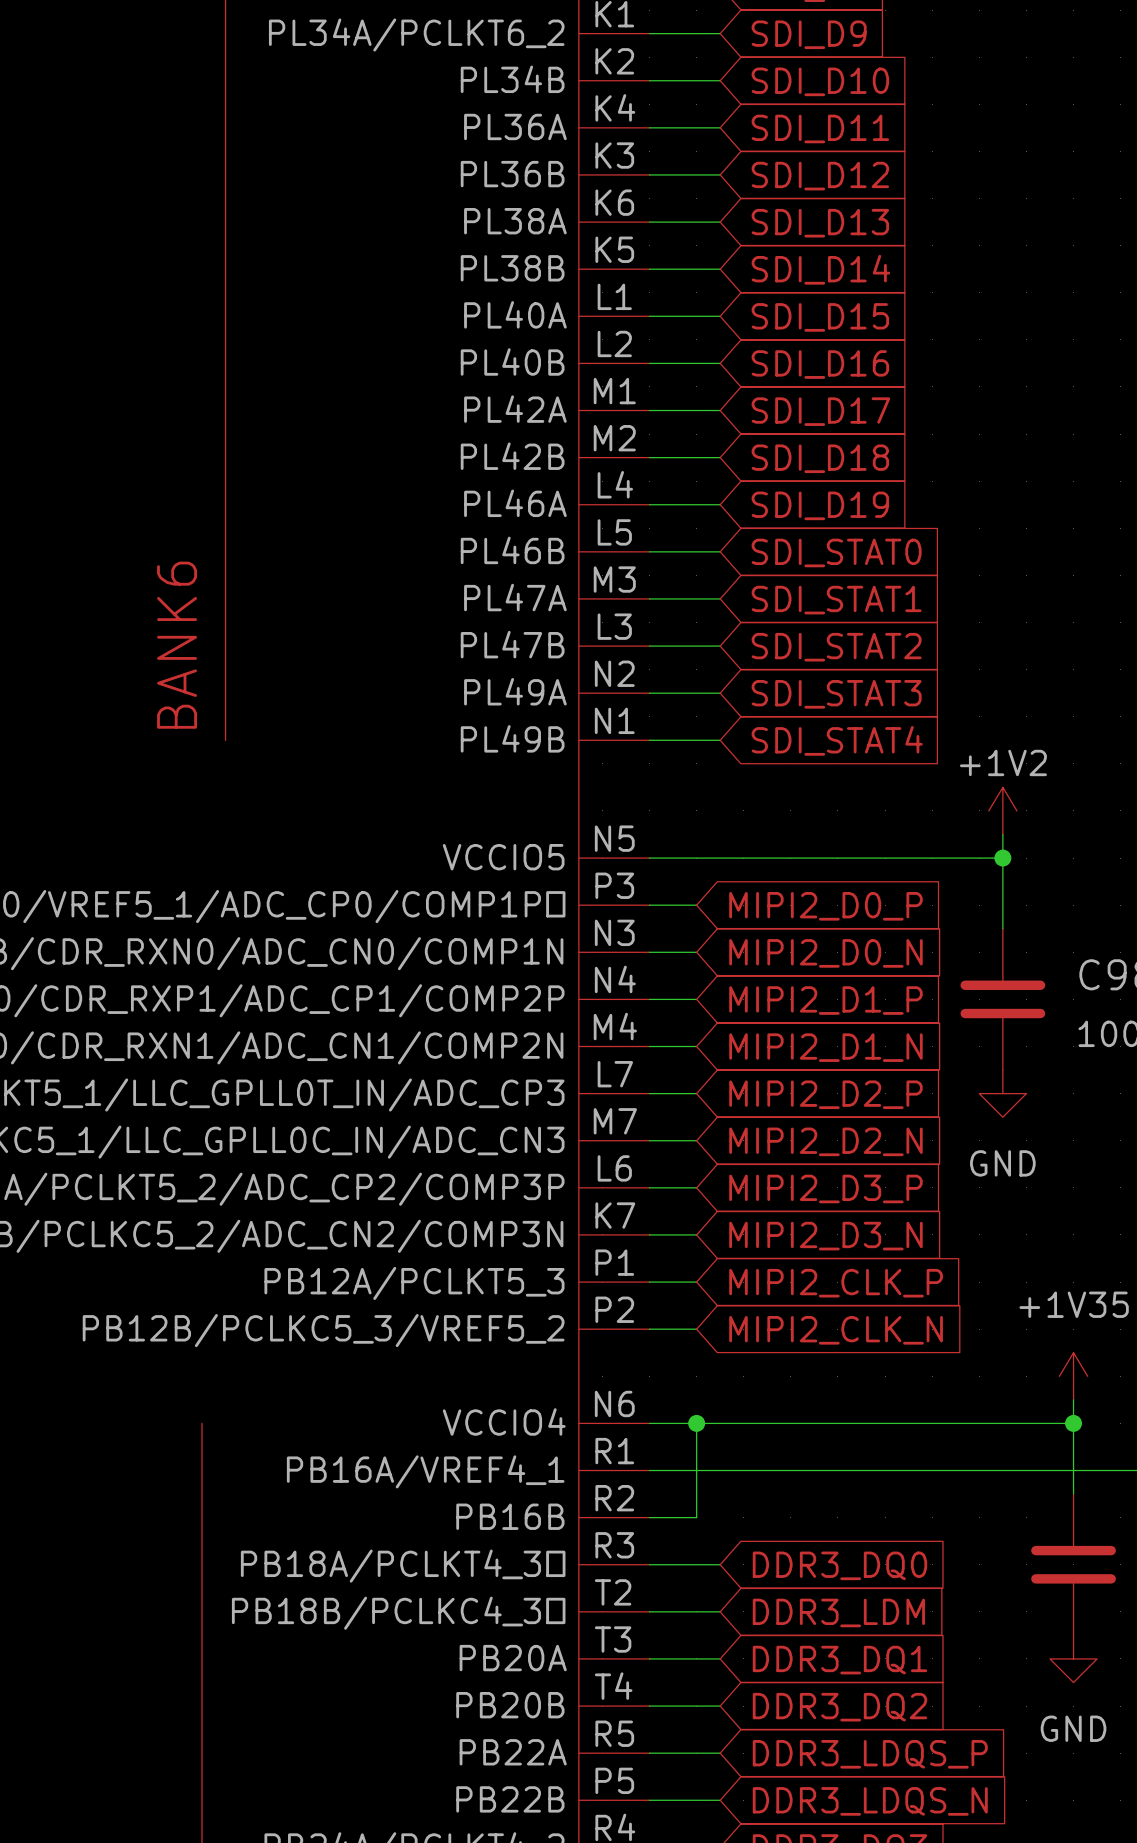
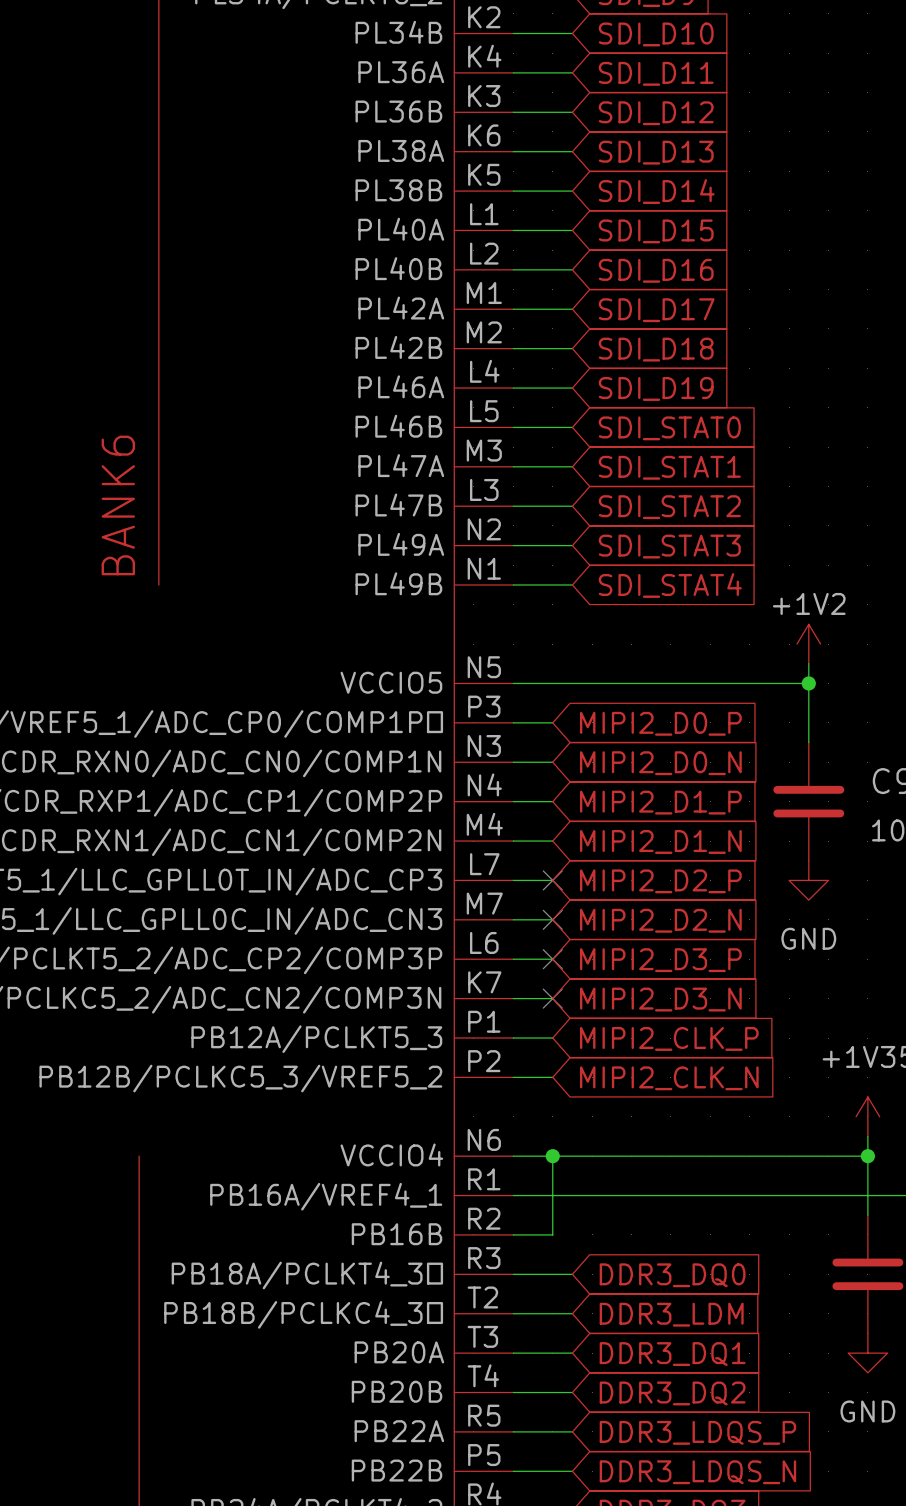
no-connect mark: none -> (552, 880)
no-connect mark: none -> (552, 919)
no-connect mark: none -> (552, 959)
no-connect mark: none -> (552, 998)

